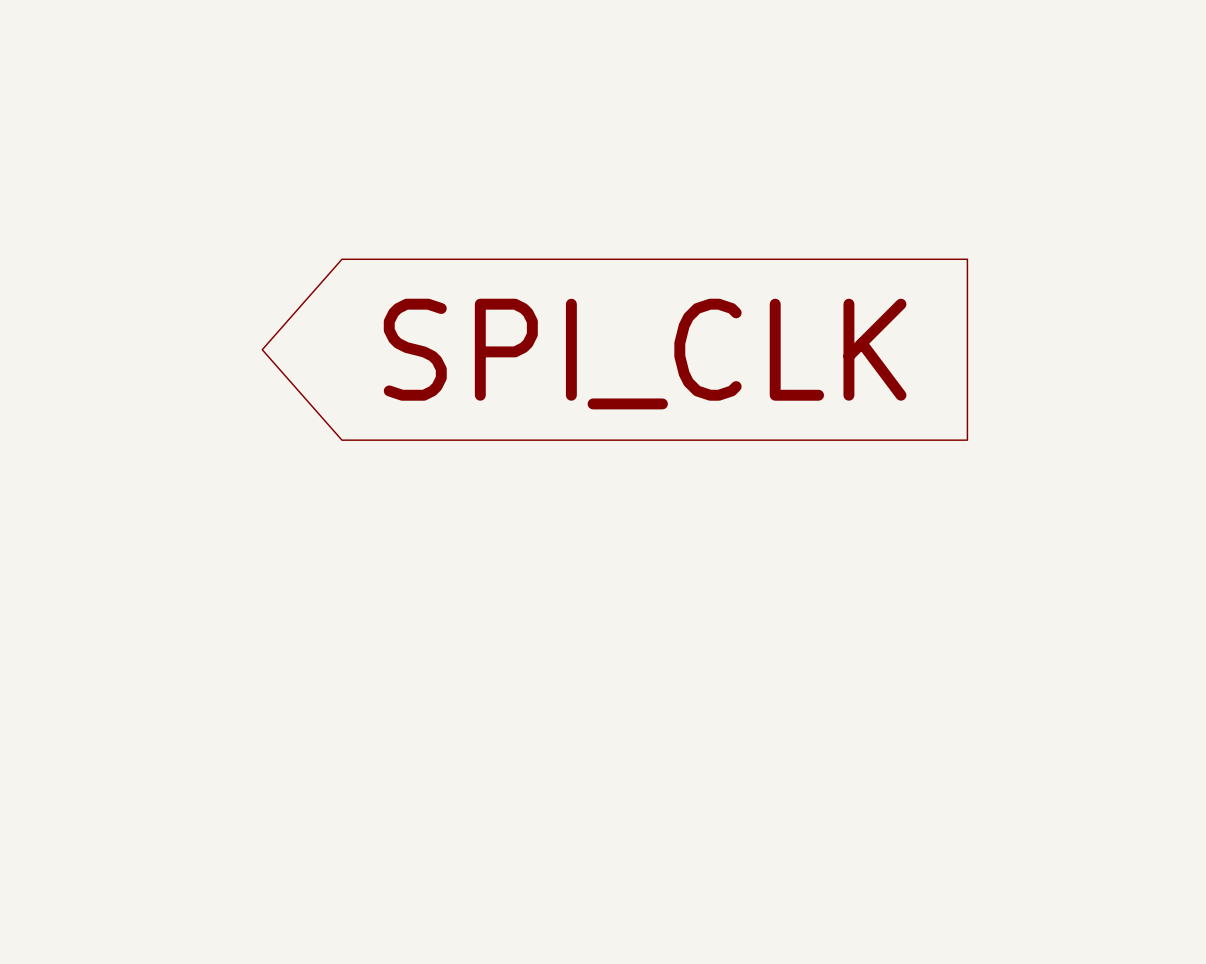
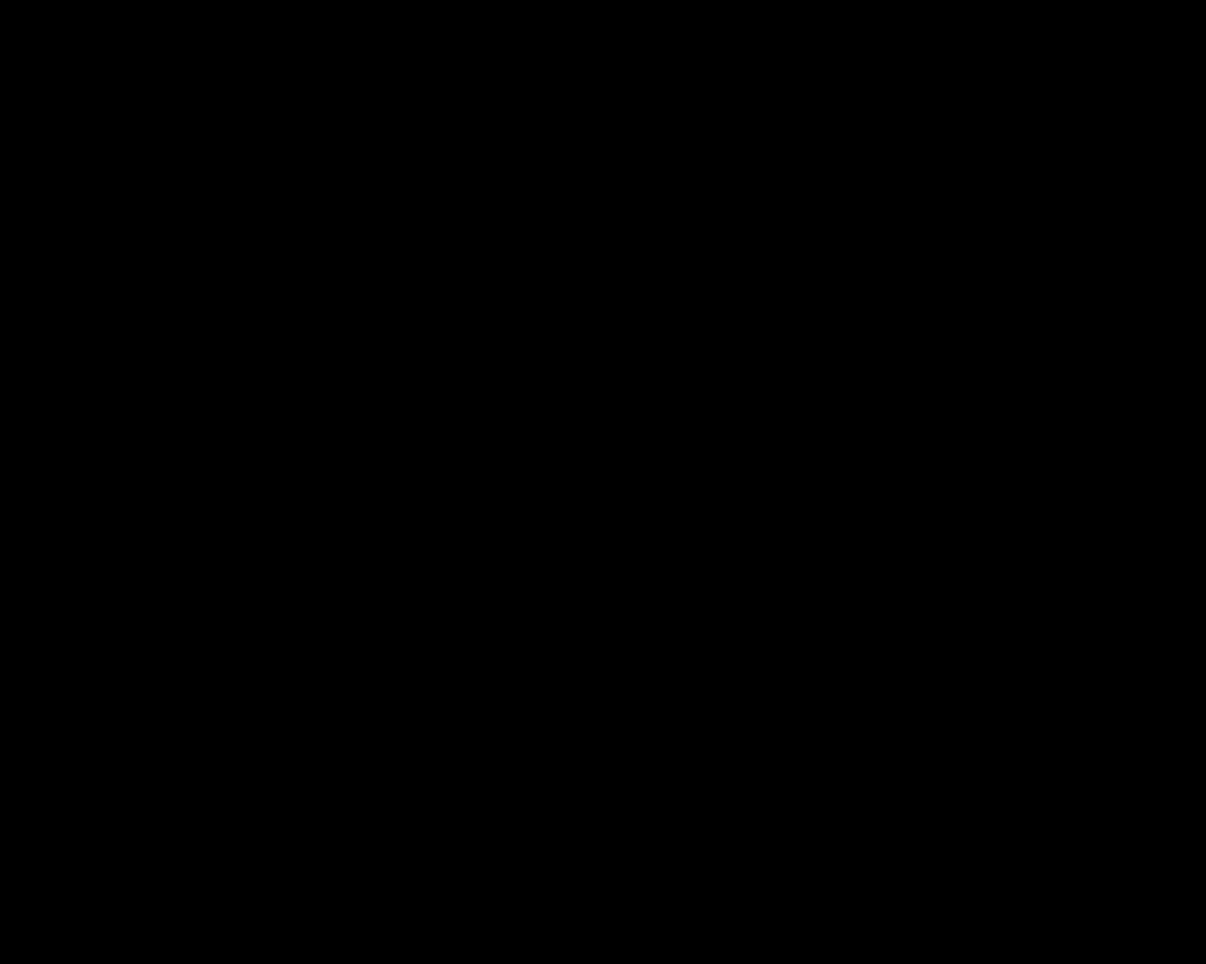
global label: SPI_CLK (645, 354) -> none

